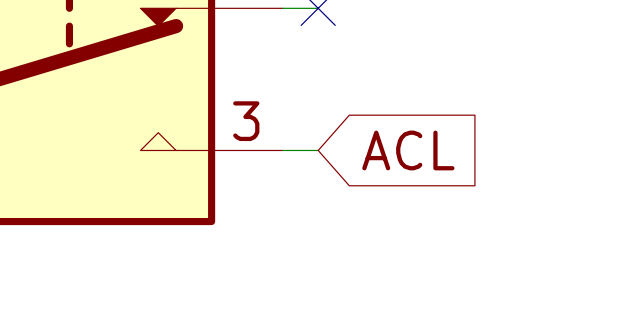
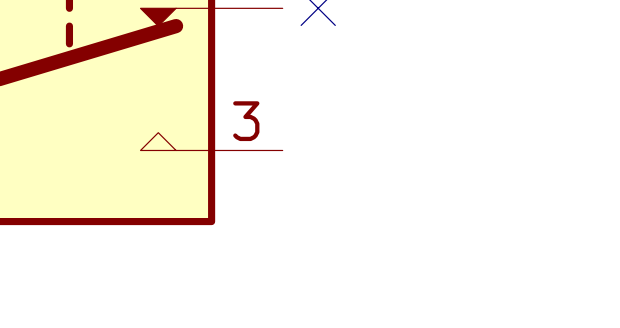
wire: (282, 8) (318, 8) -> none
wire: (282, 150) (318, 150) -> none
global label: ACL (408, 150) -> none

